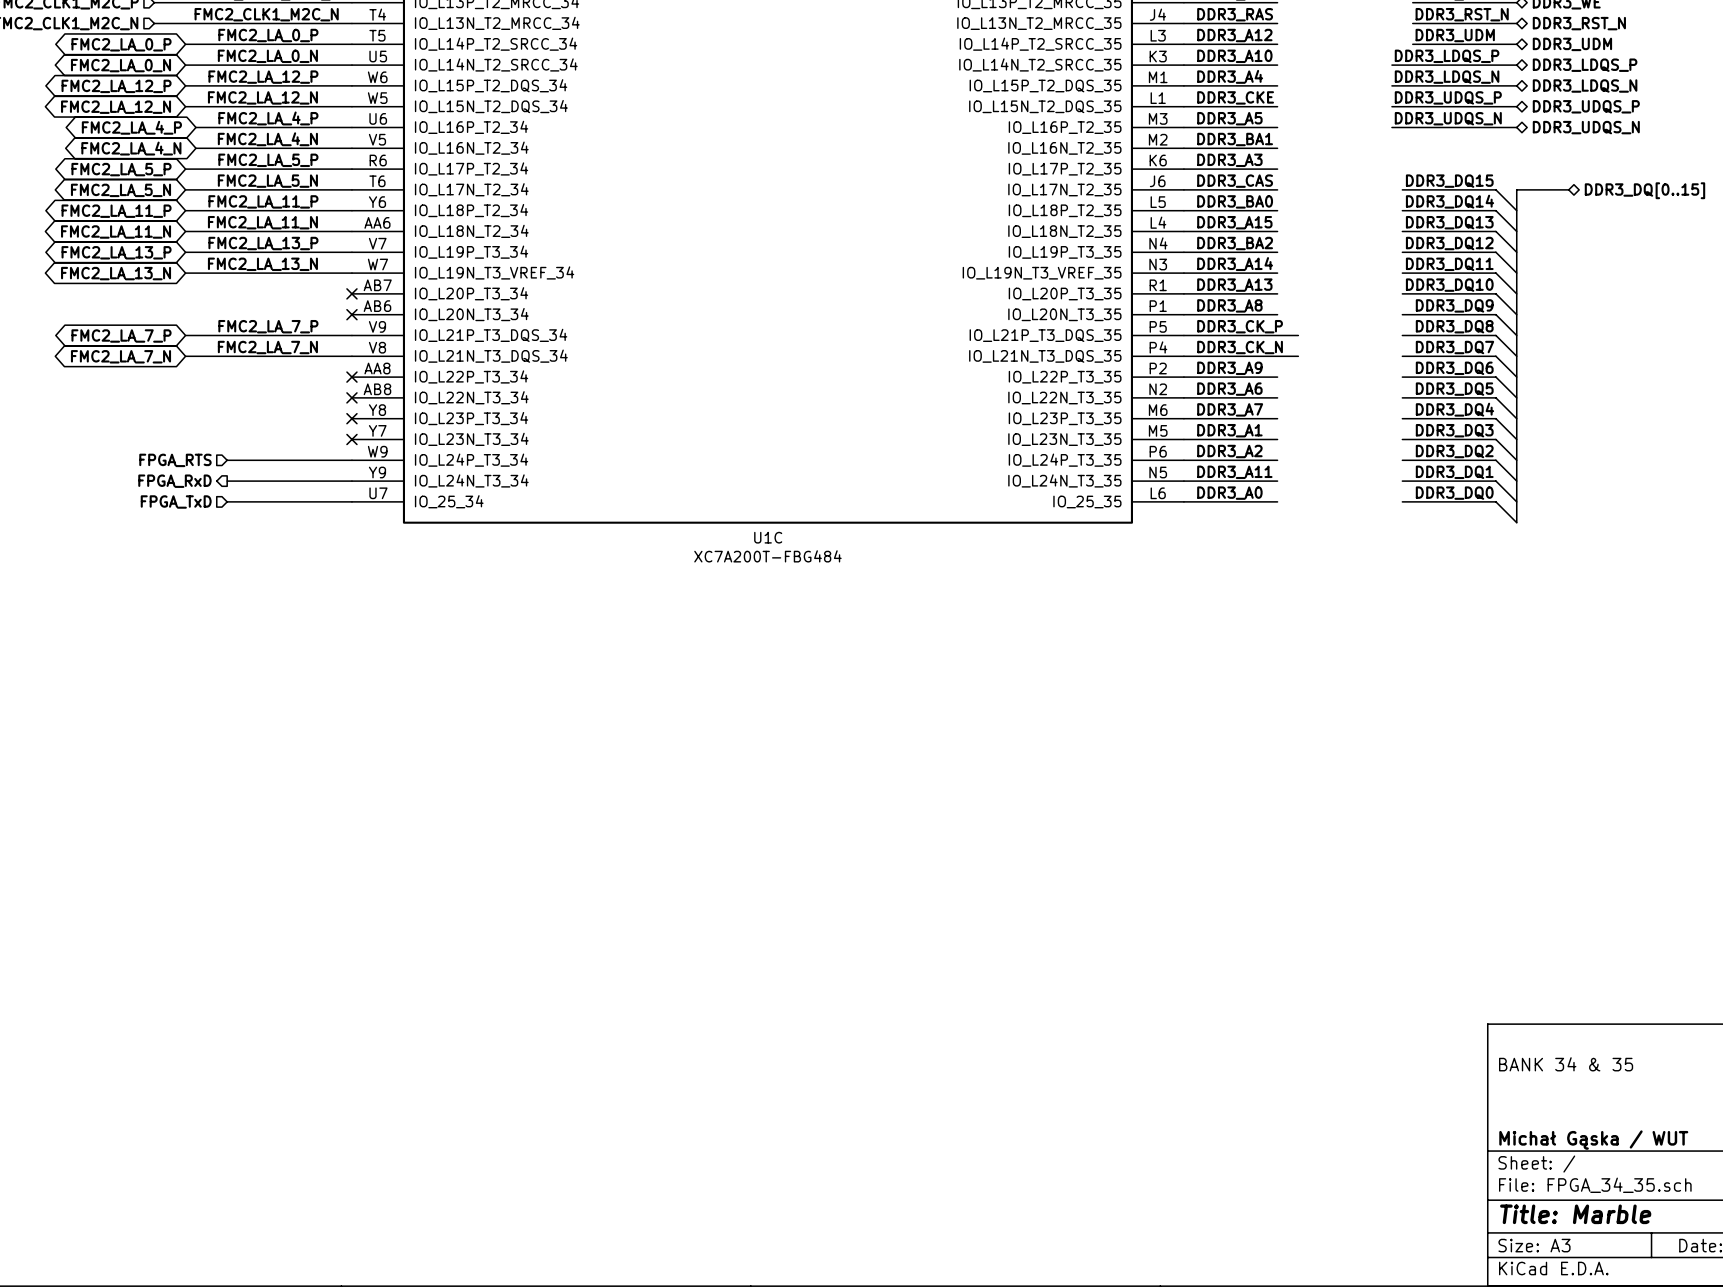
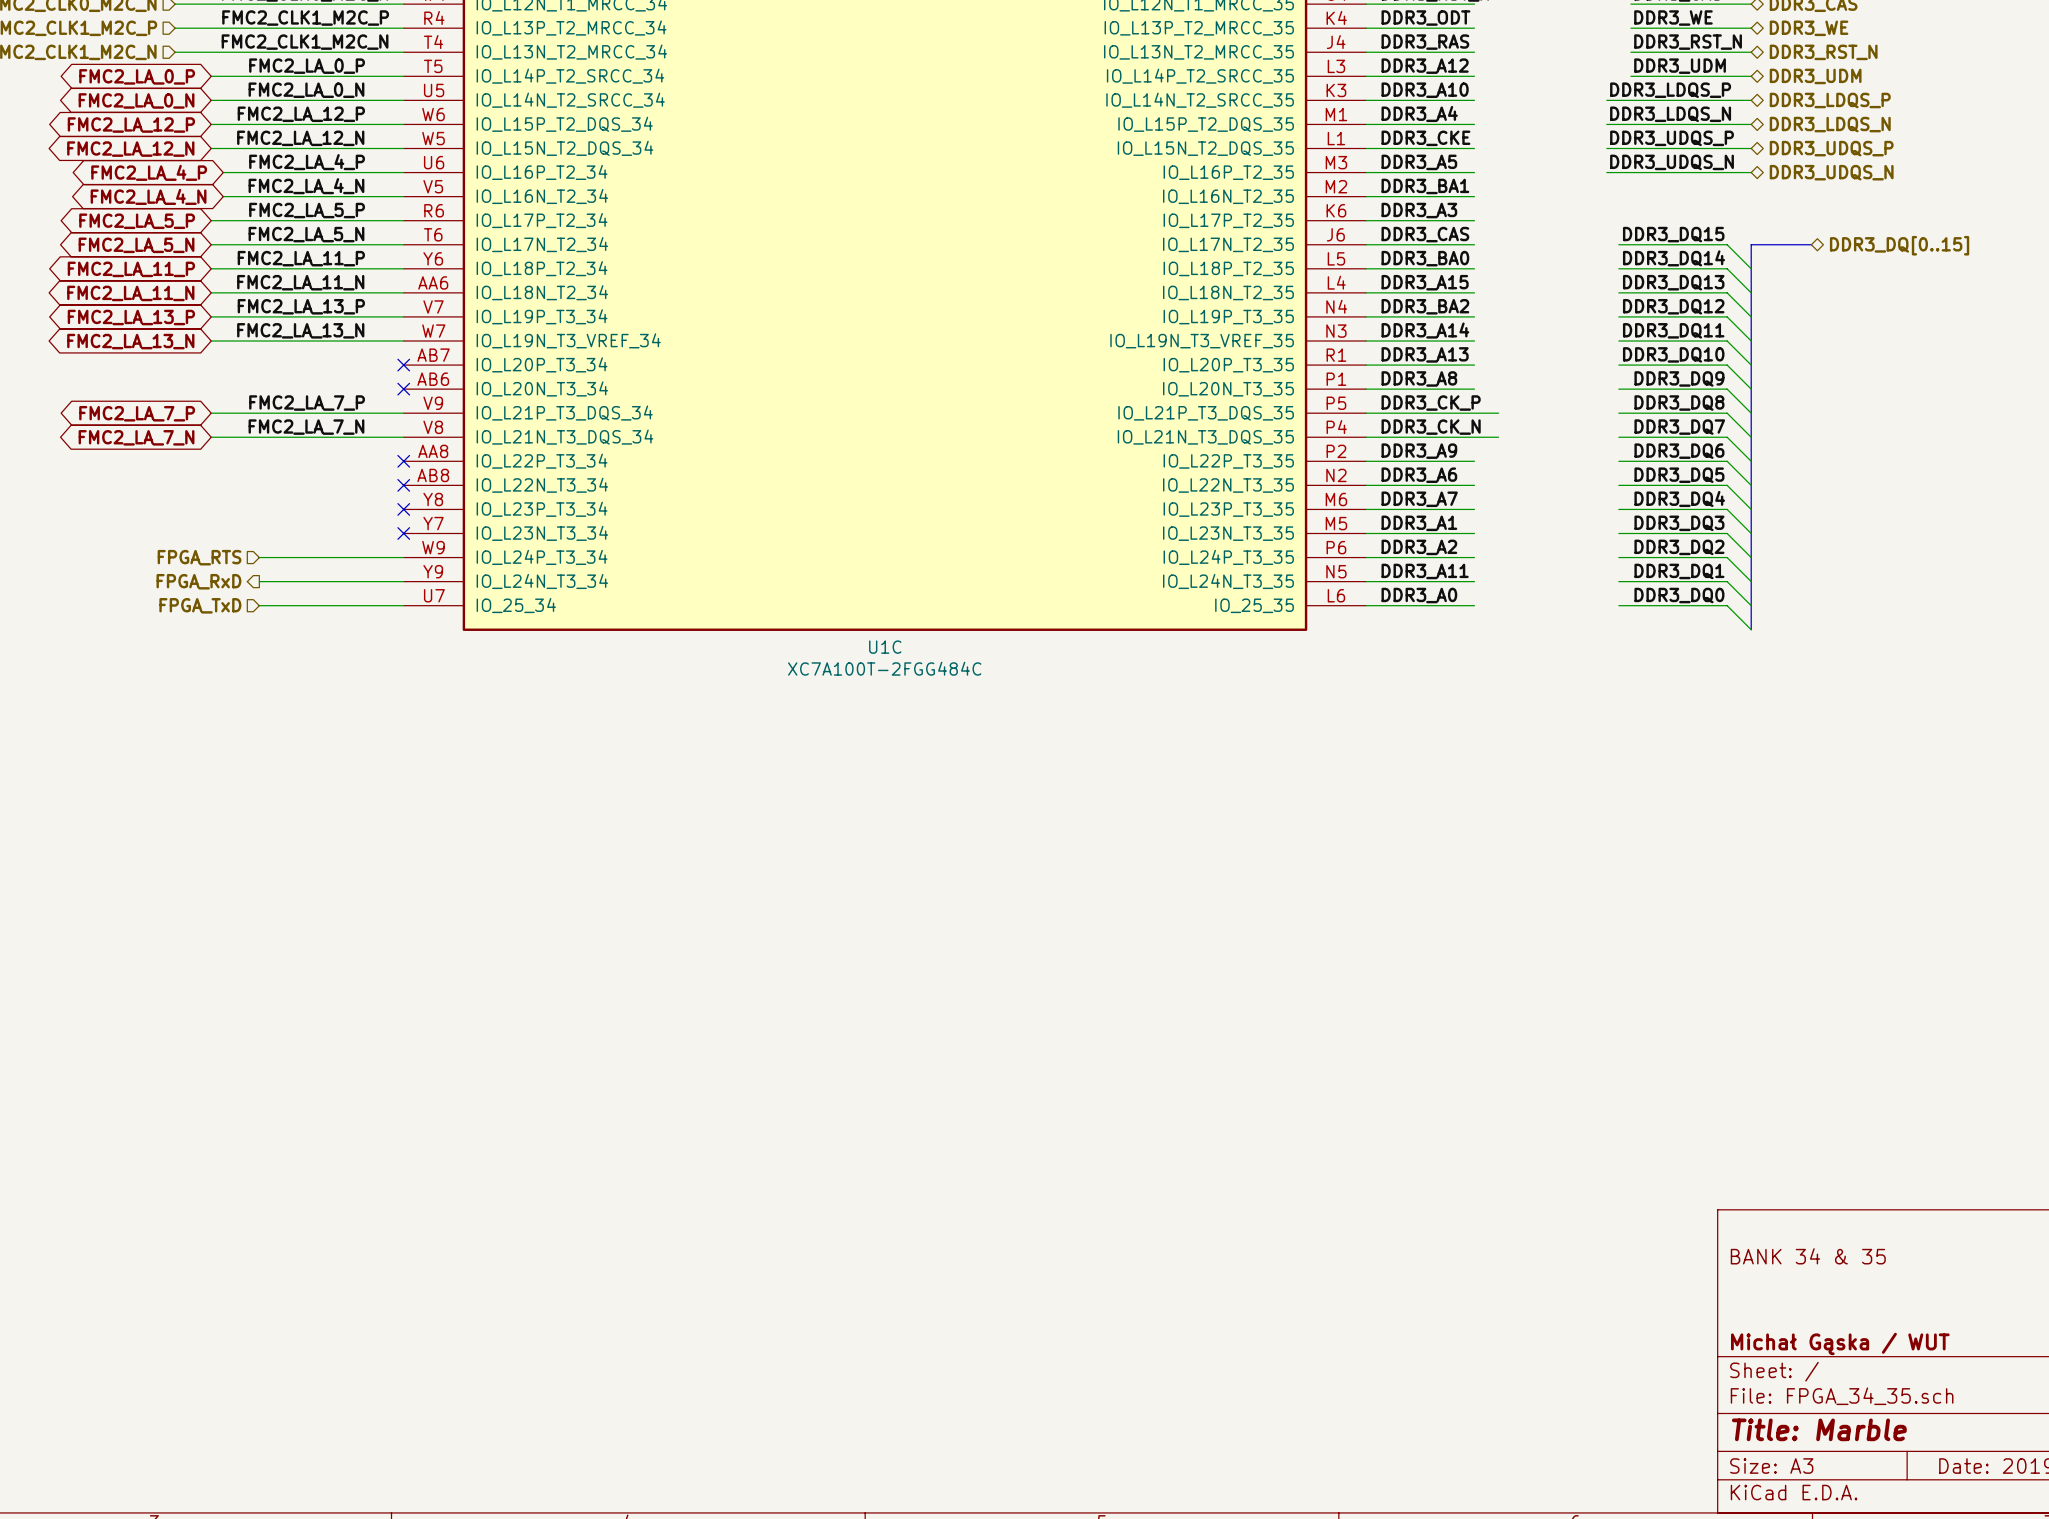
U1C value: XC7A200T-FBG484 (767, 556) -> XC7A100T-2FGG484C (884, 668)

